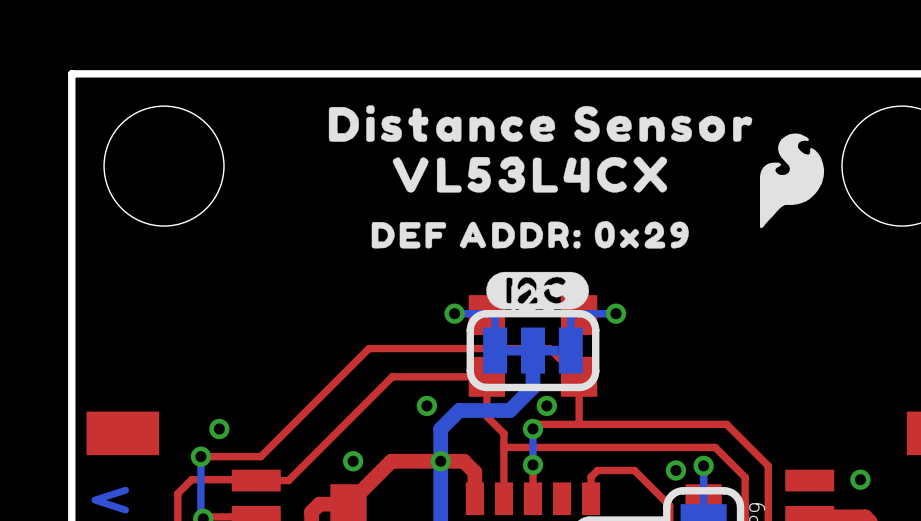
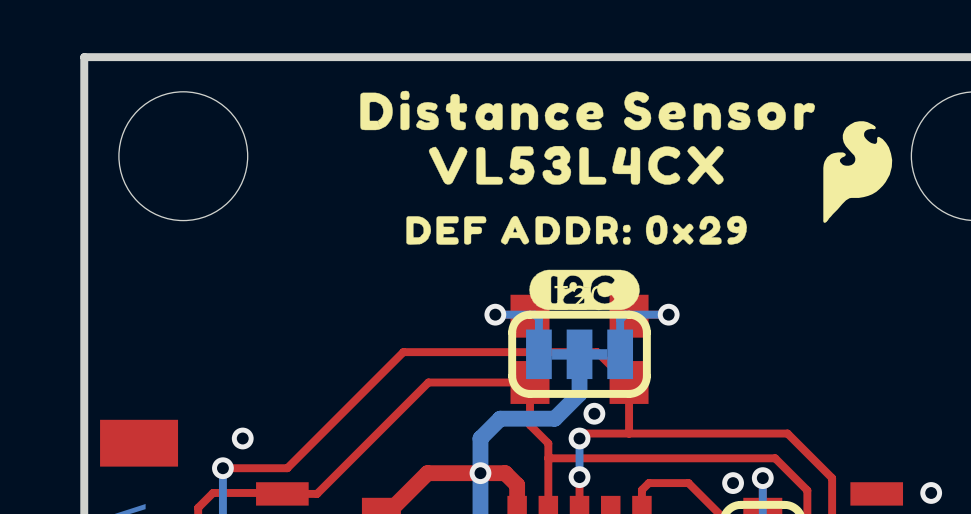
via: (426, 405) -> none
via: (353, 461) -> none

